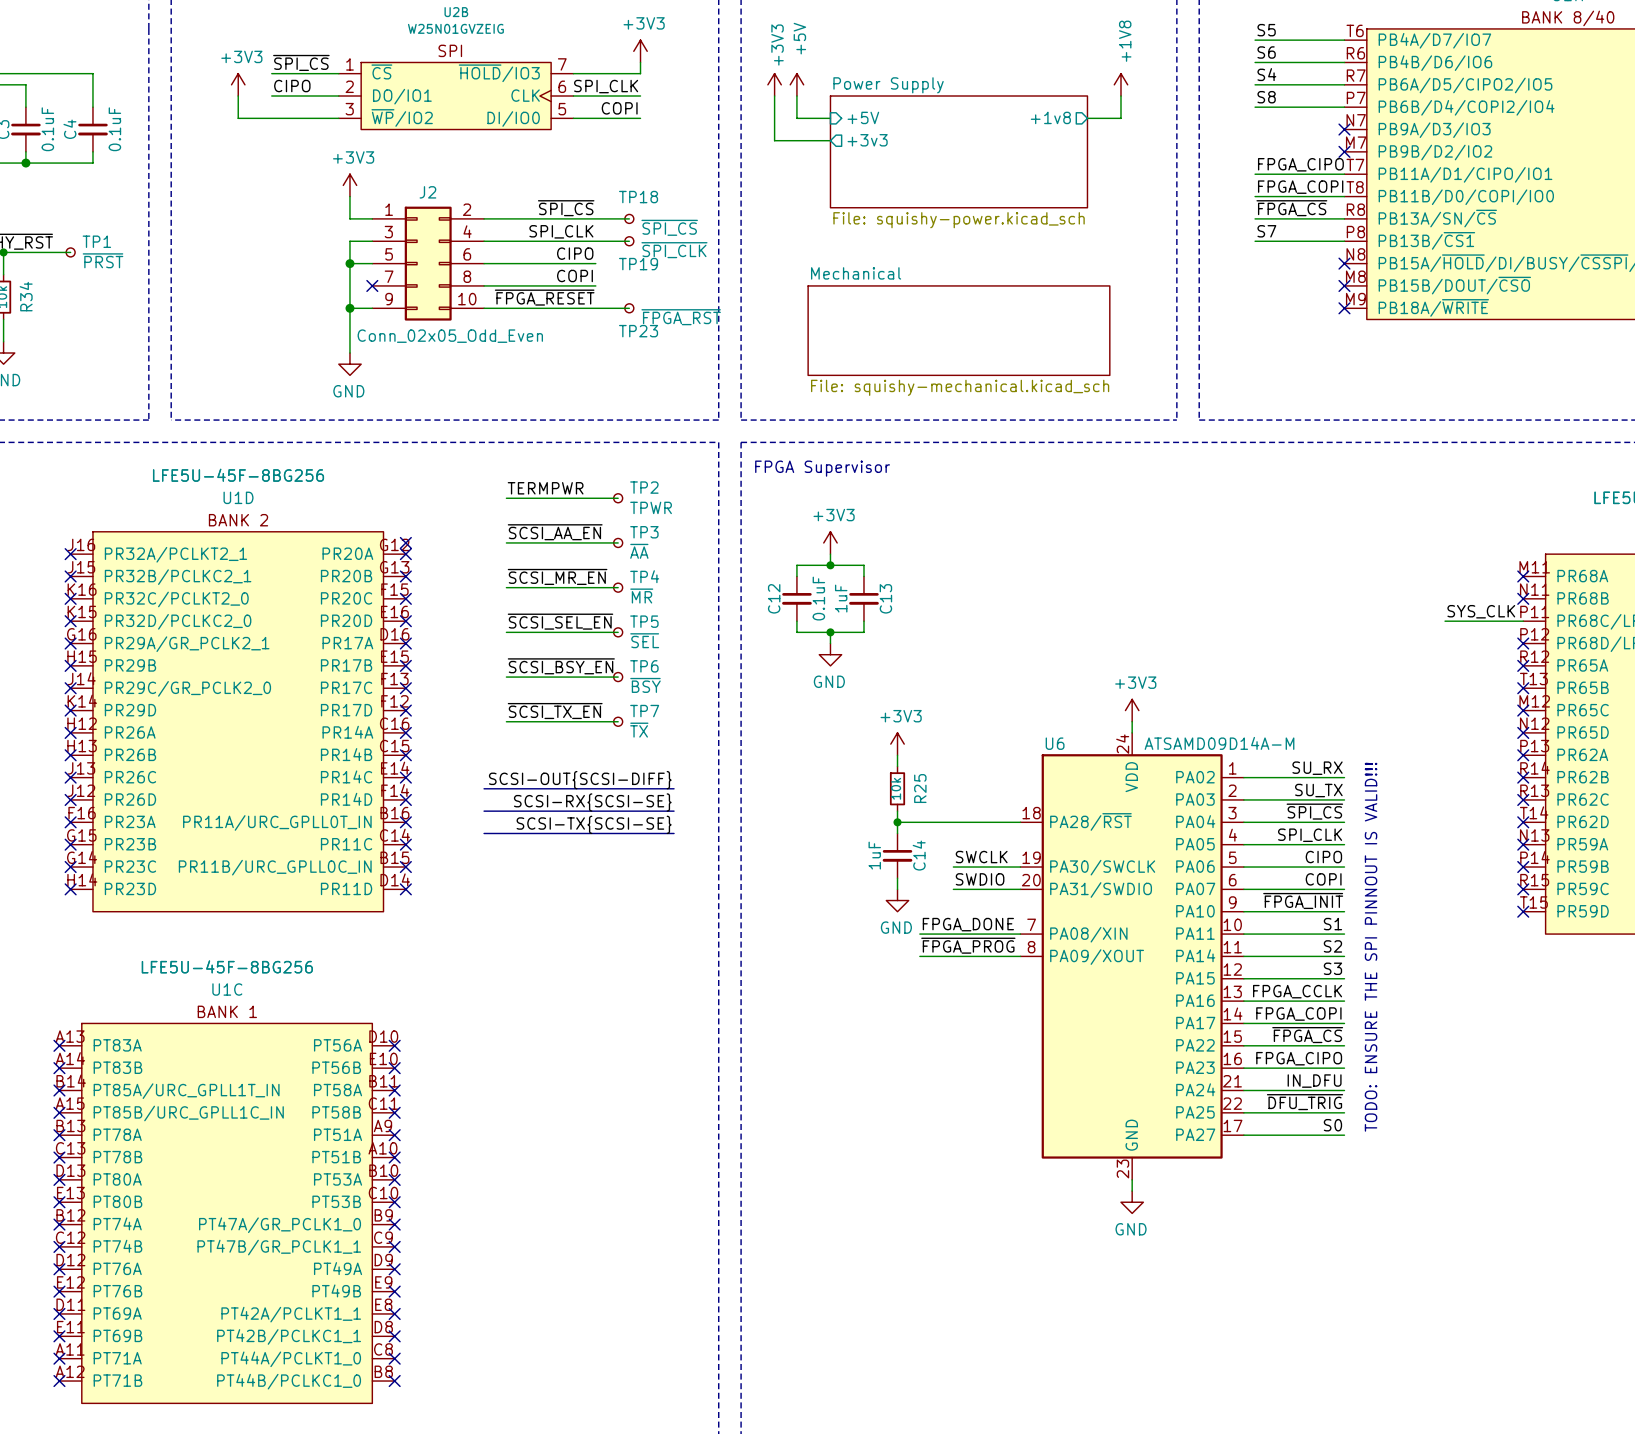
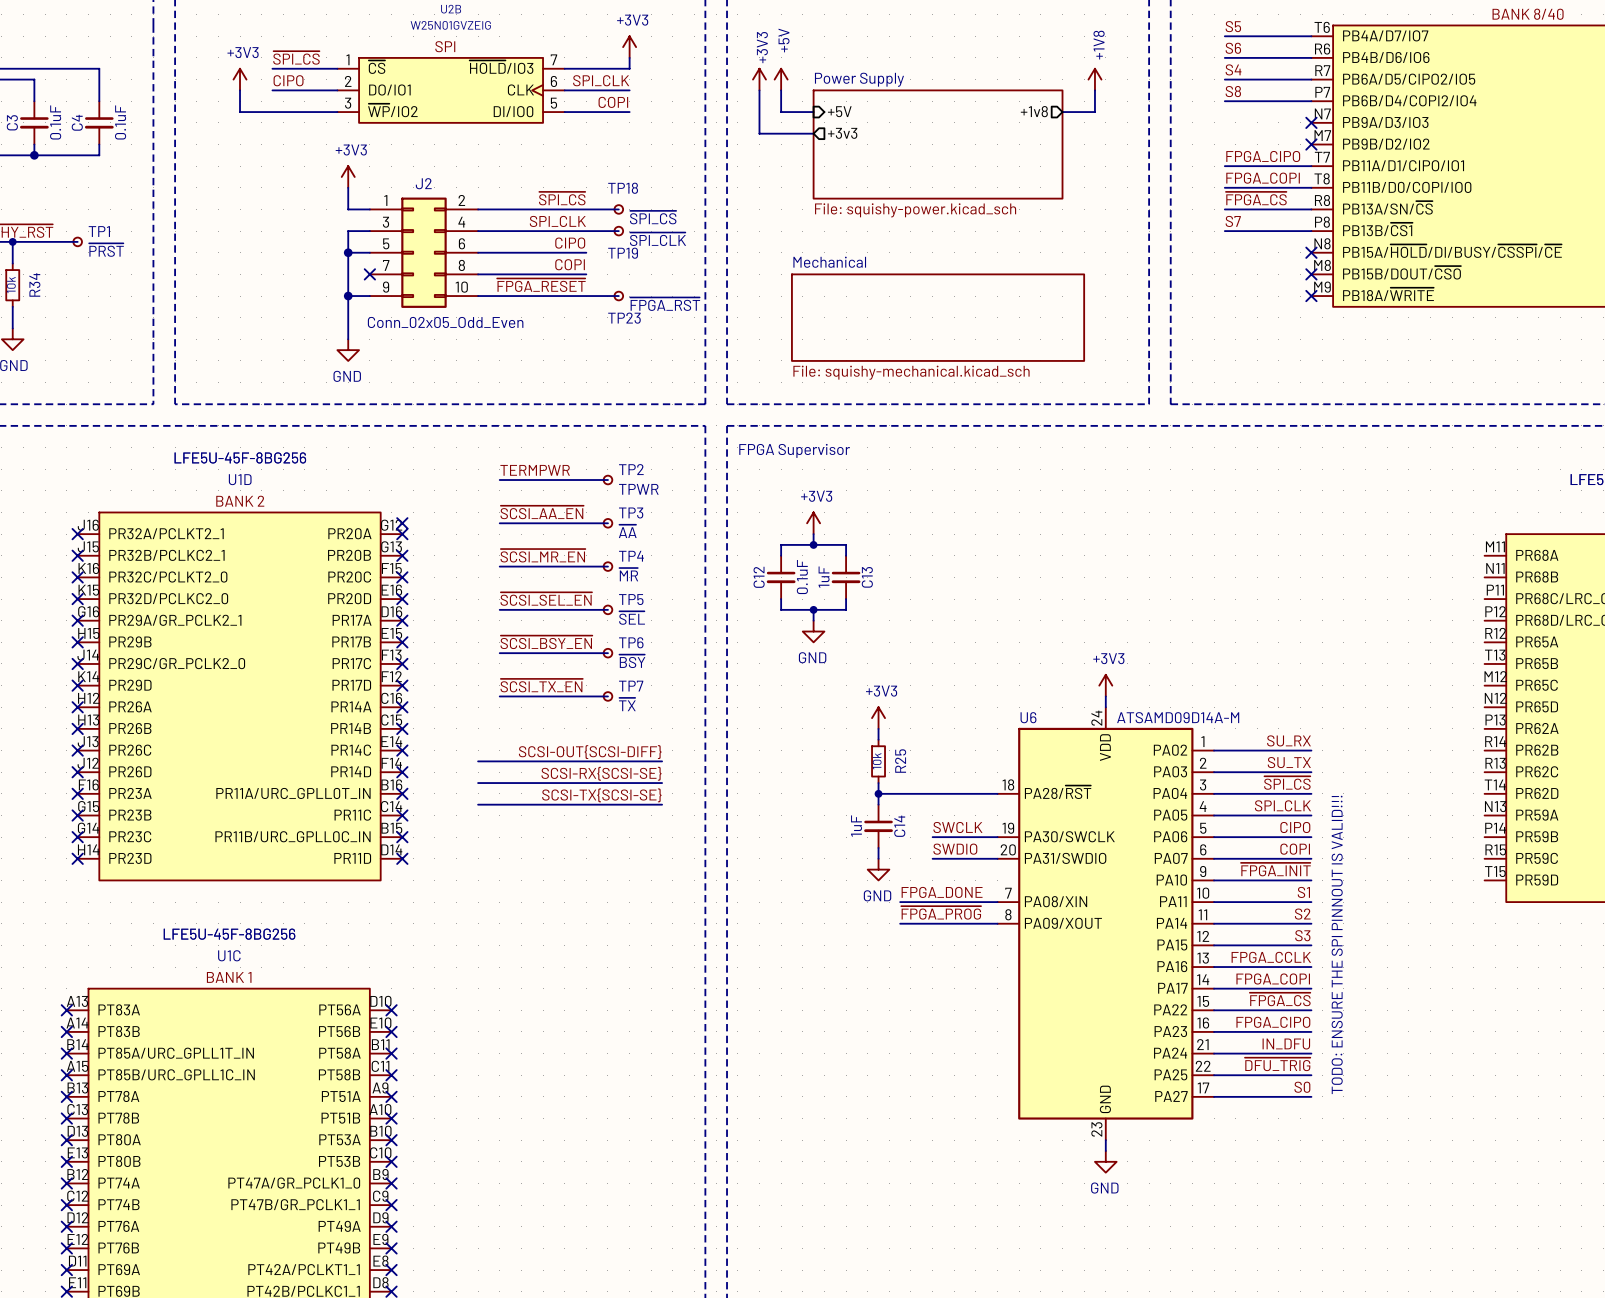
no-connect mark: (1523, 576) -> none
no-connect mark: (1523, 598) -> none
label: SYS_CLK (1481, 611) -> none
wire: (1445, 621) (1523, 621) -> none
no-connect mark: (1523, 643) -> none
no-connect mark: (1523, 665) -> none
no-connect mark: (1523, 688) -> none
no-connect mark: (1523, 710) -> none
no-connect mark: (1523, 732) -> none
no-connect mark: (1523, 755) -> none
no-connect mark: (1523, 777) -> none
no-connect mark: (1523, 799) -> none
no-connect mark: (1523, 822) -> none
no-connect mark: (1523, 844) -> none
no-connect mark: (1523, 867) -> none
no-connect mark: (1523, 889) -> none
no-connect mark: (1523, 911) -> none

